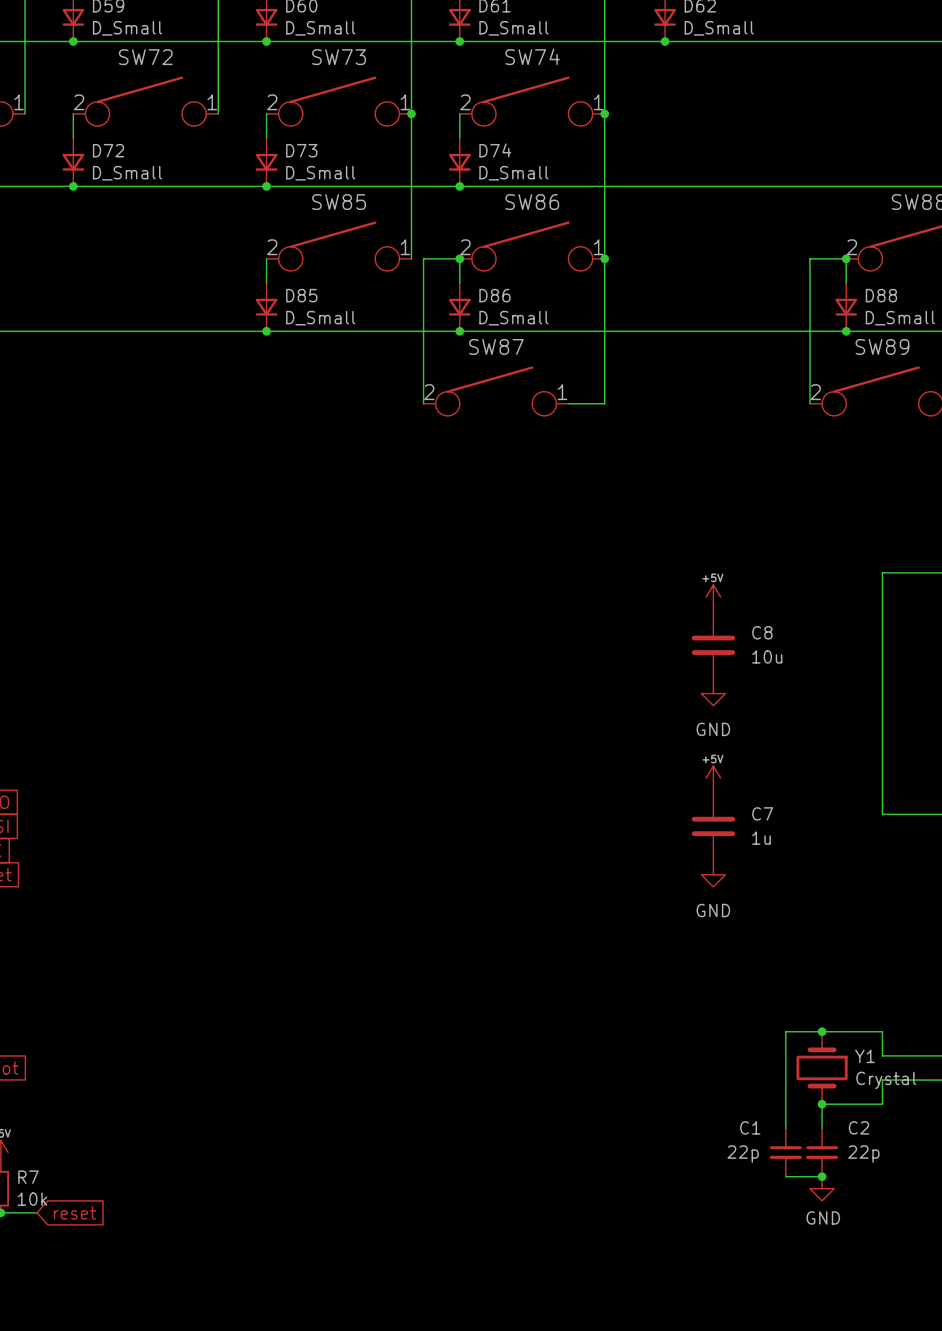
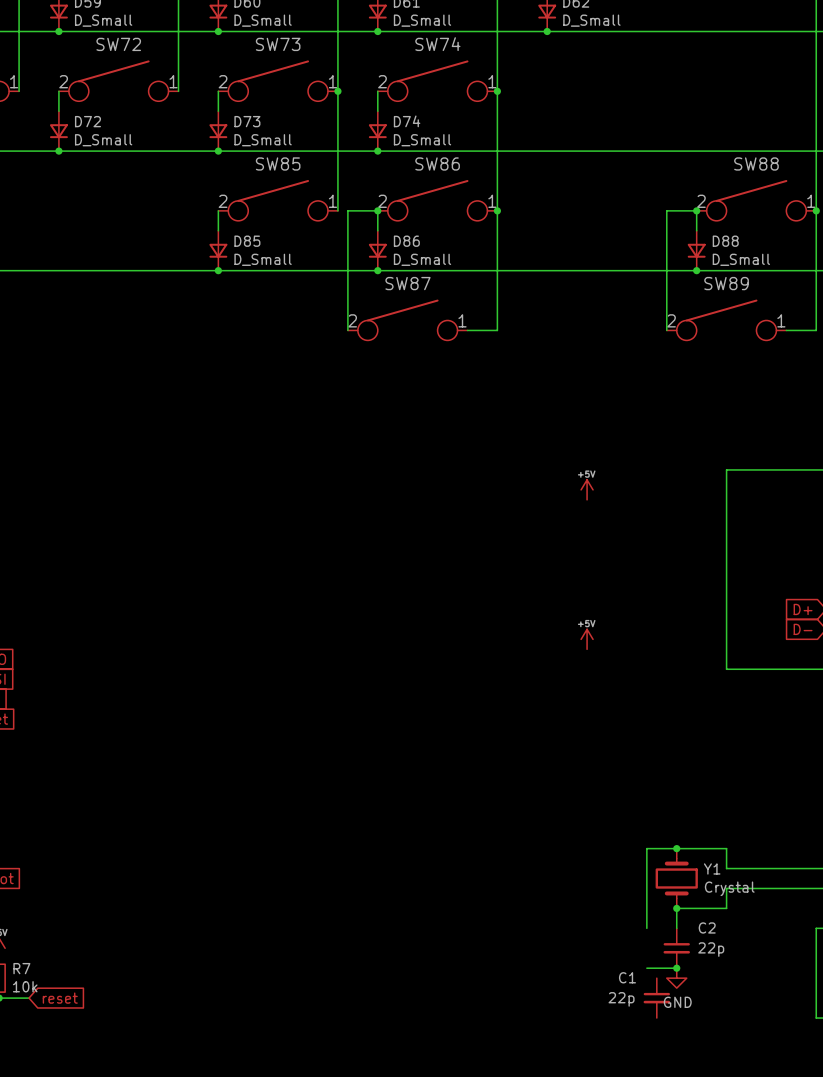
C8: 10u (713, 645) -> none
power symbol: GND (713, 693) -> none
C7: 1u (713, 826) -> none
power symbol: GND (713, 874) -> none
C1 position: (785, 1152) -> (656, 998)

